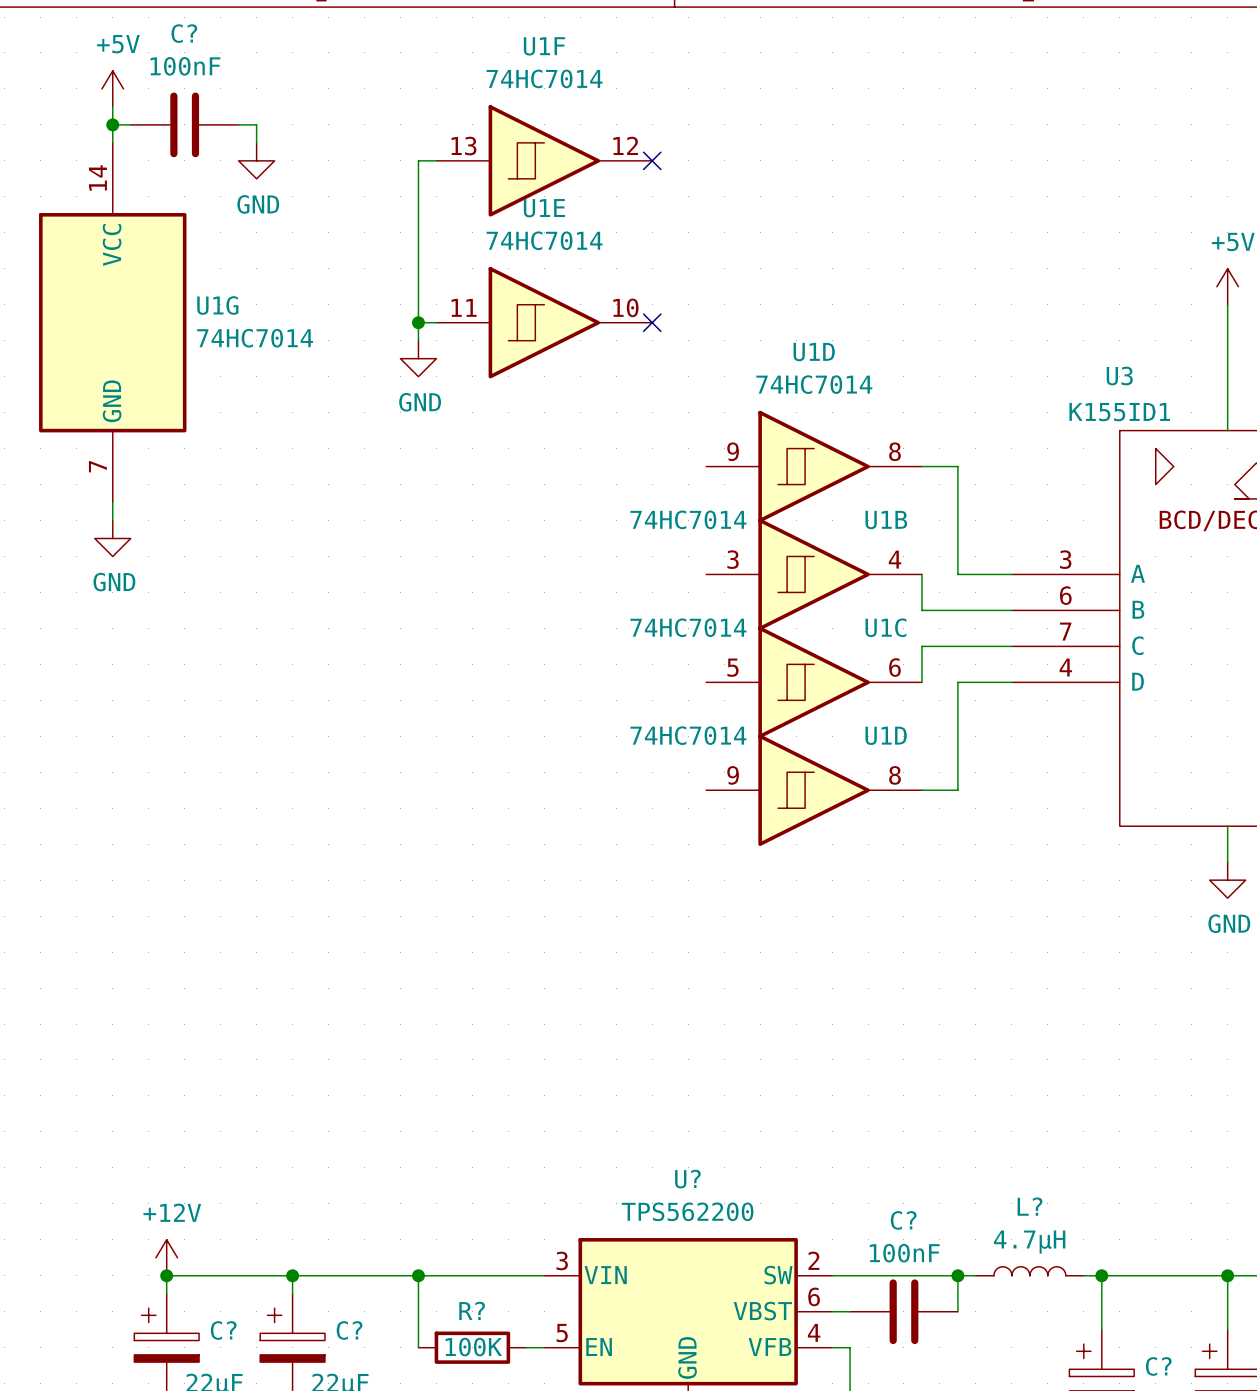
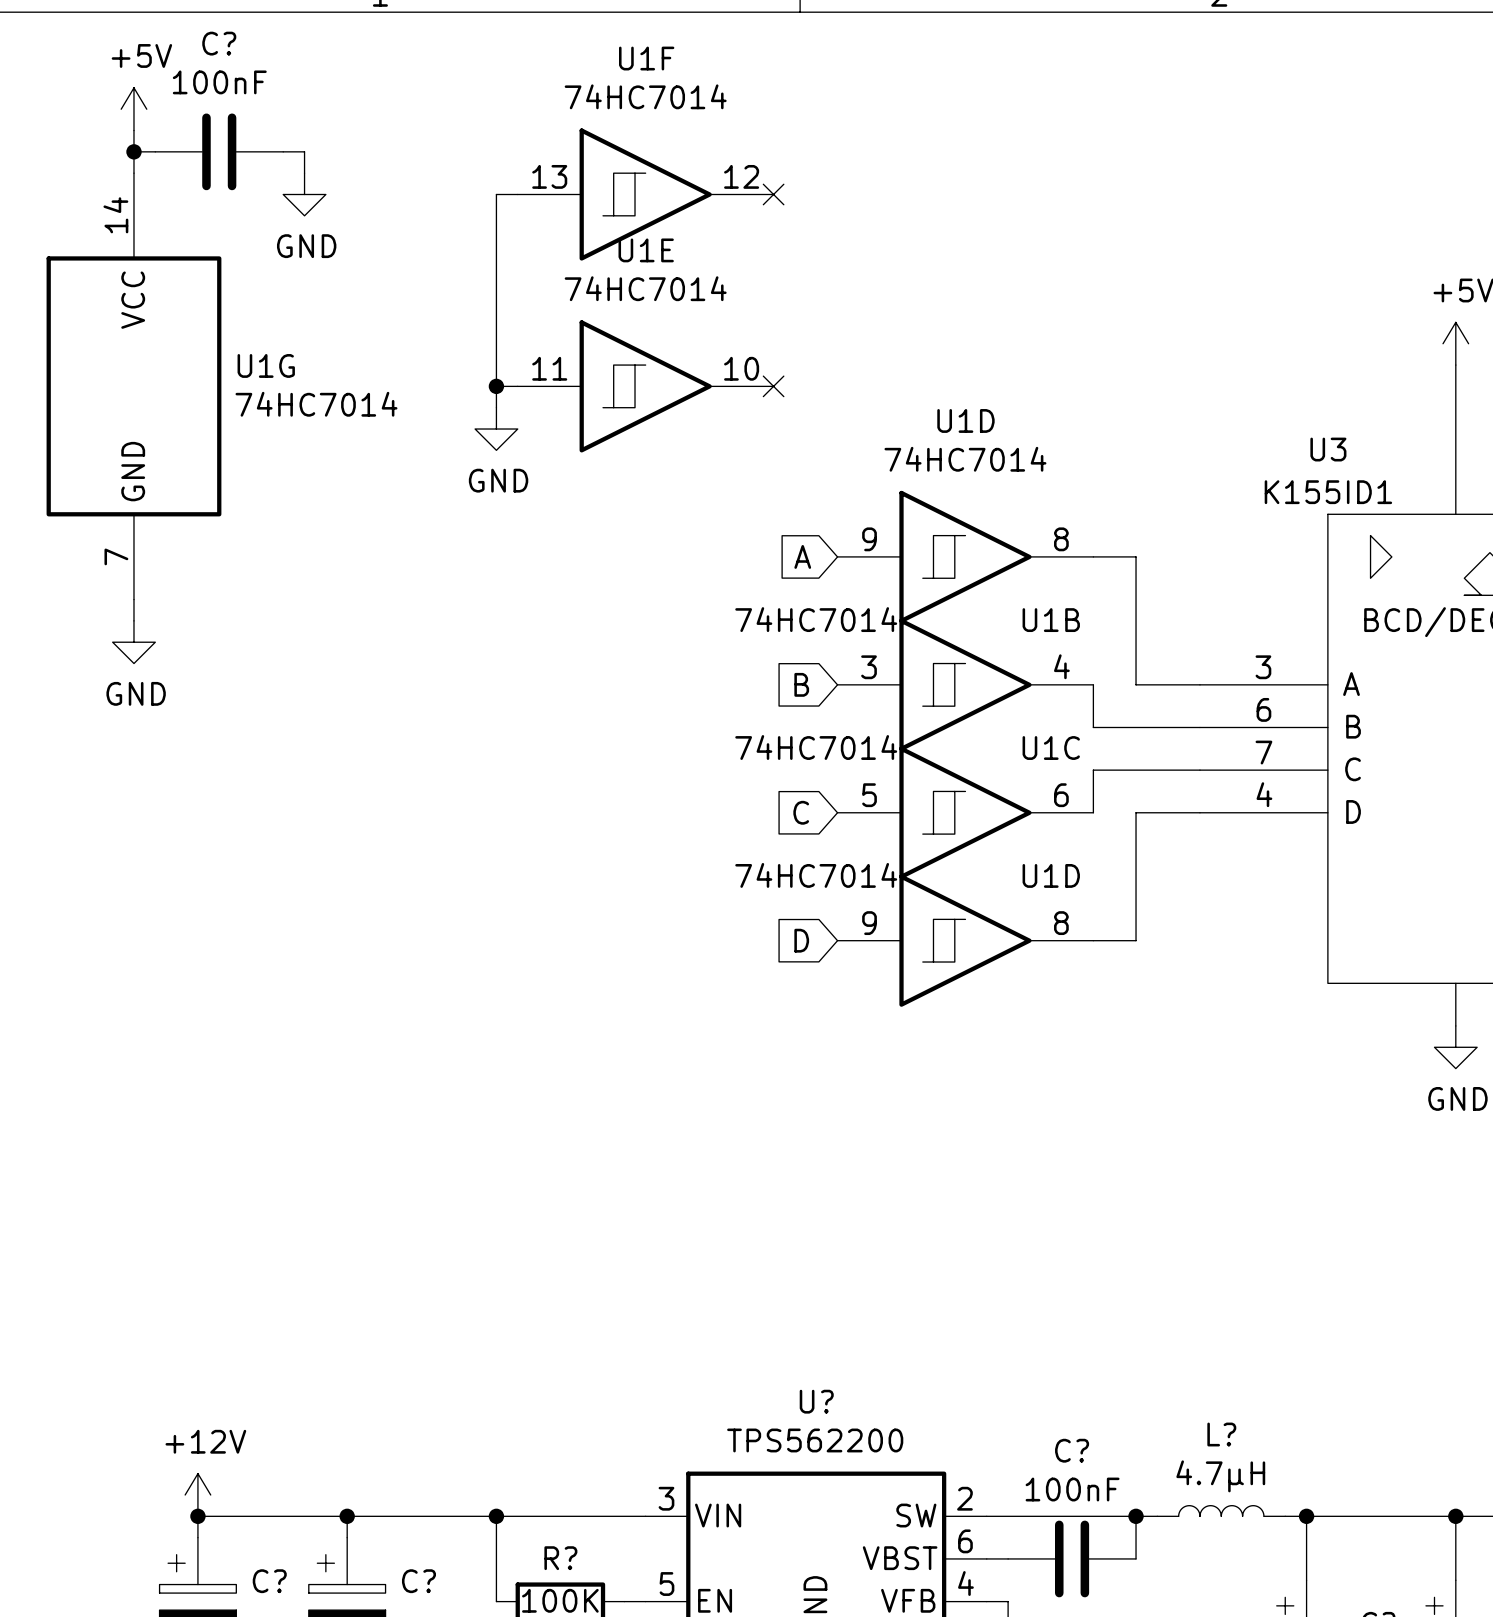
global label: none -> A (802, 556)
global label: none -> B (801, 684)
global label: none -> C (801, 812)
global label: none -> D (801, 940)

